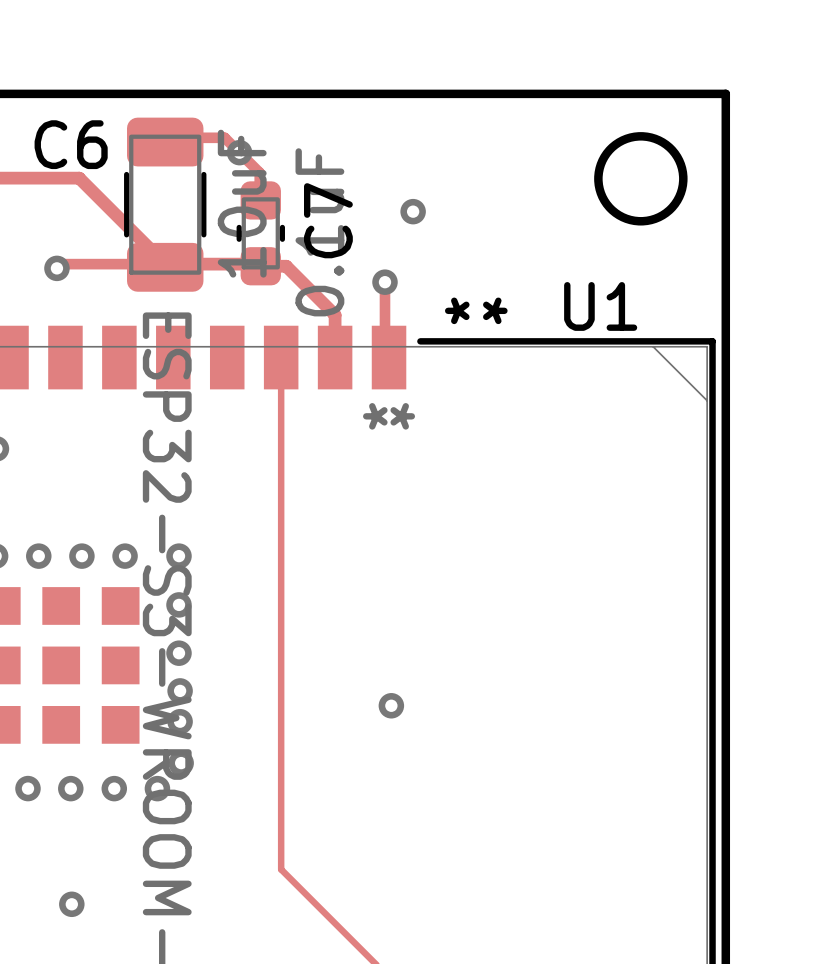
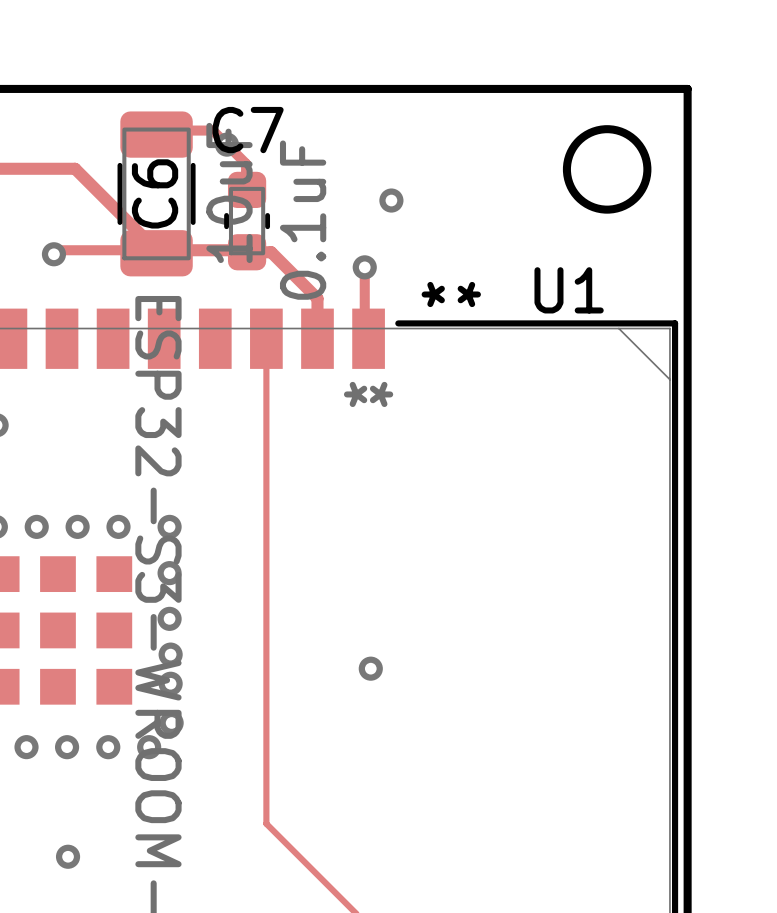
C6 name rotation: 0° (71, 144) -> 90° counterclockwise (155, 193)
C6 name position: C6 (71, 144) -> C6 (155, 193)
C7 name rotation: 0° (328, 220) -> 90° clockwise (248, 130)
C7 name position: C7 (328, 220) -> C7 (248, 130)

